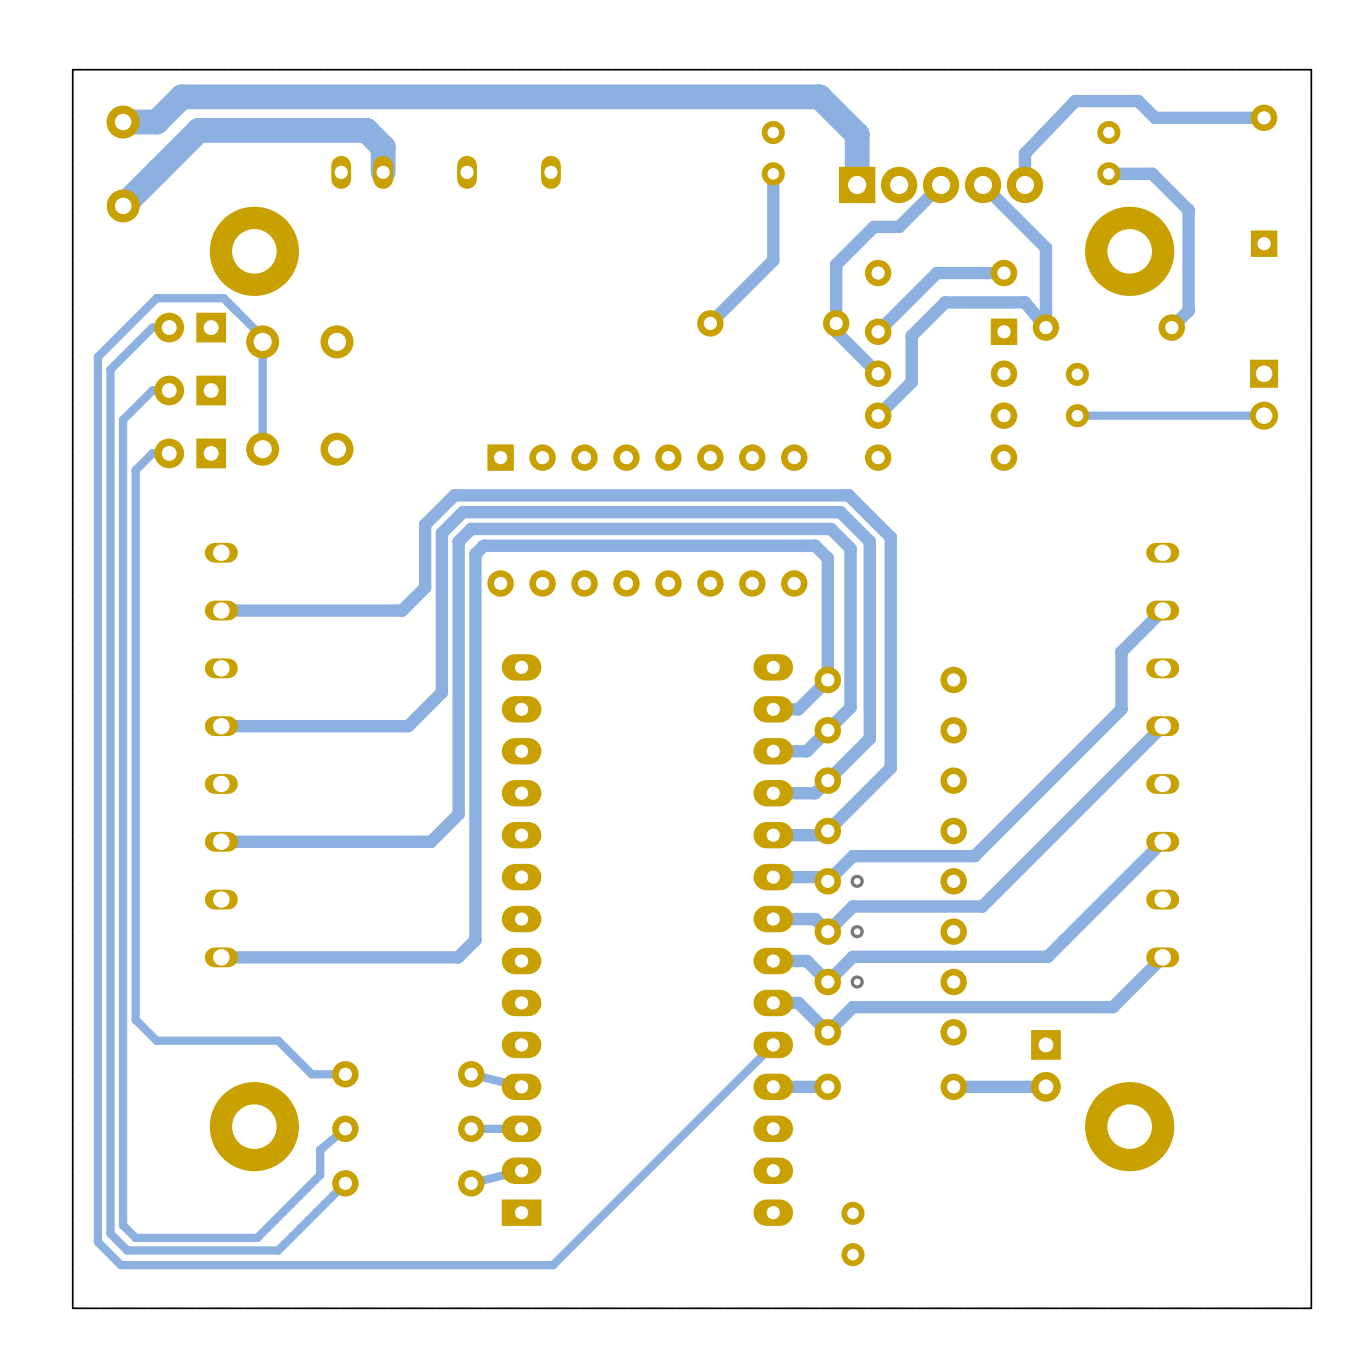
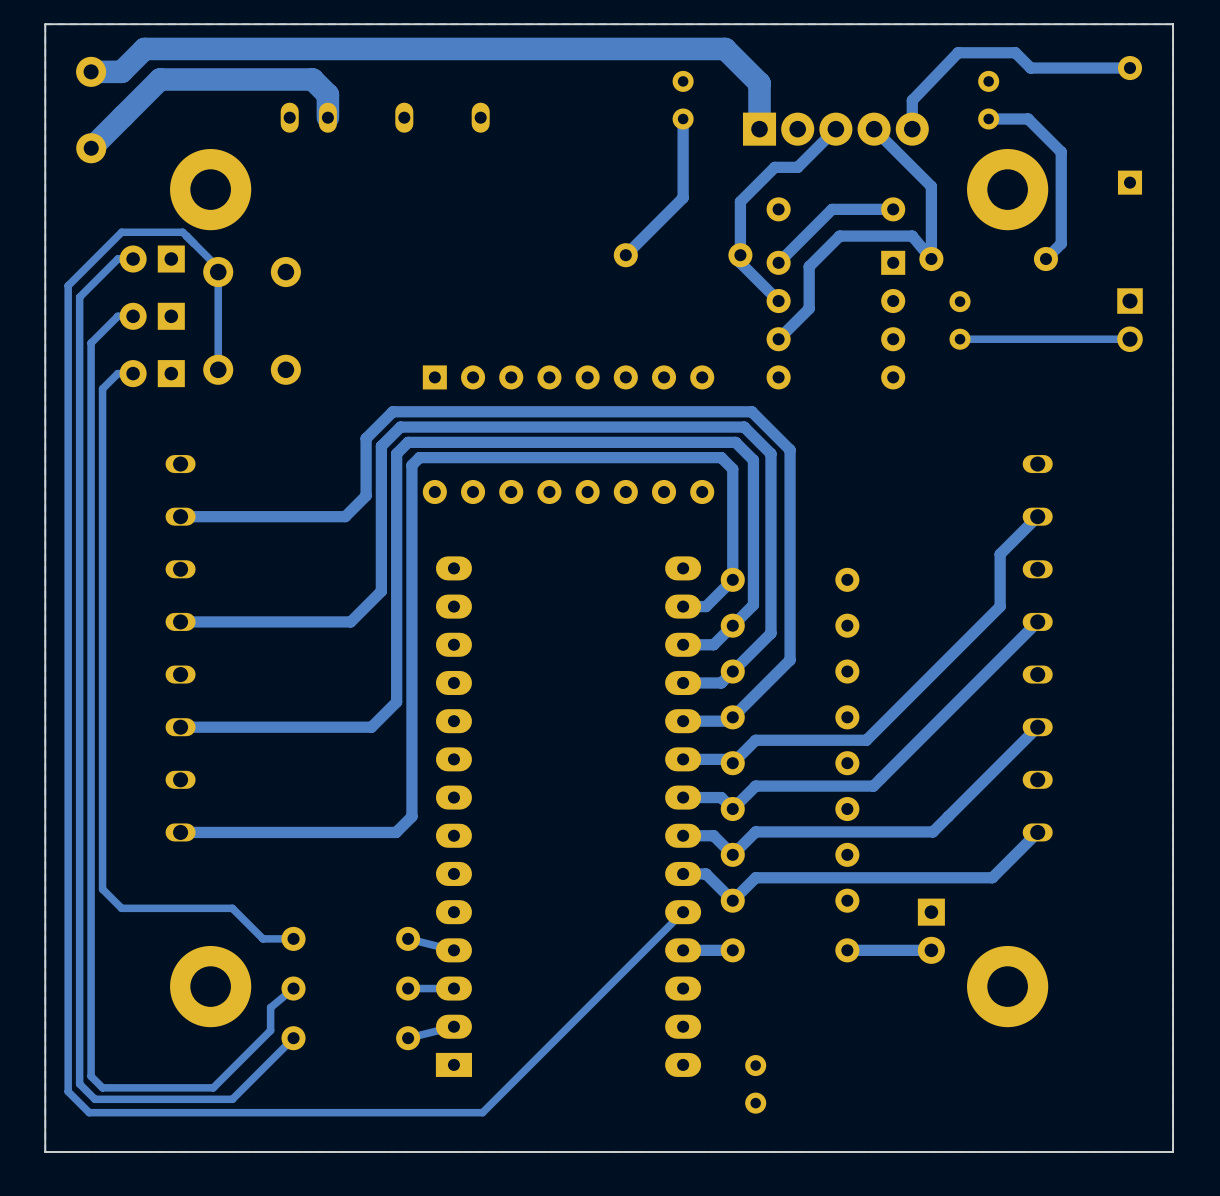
via: (857, 881) -> none
via: (857, 931) -> none
via: (857, 981) -> none

